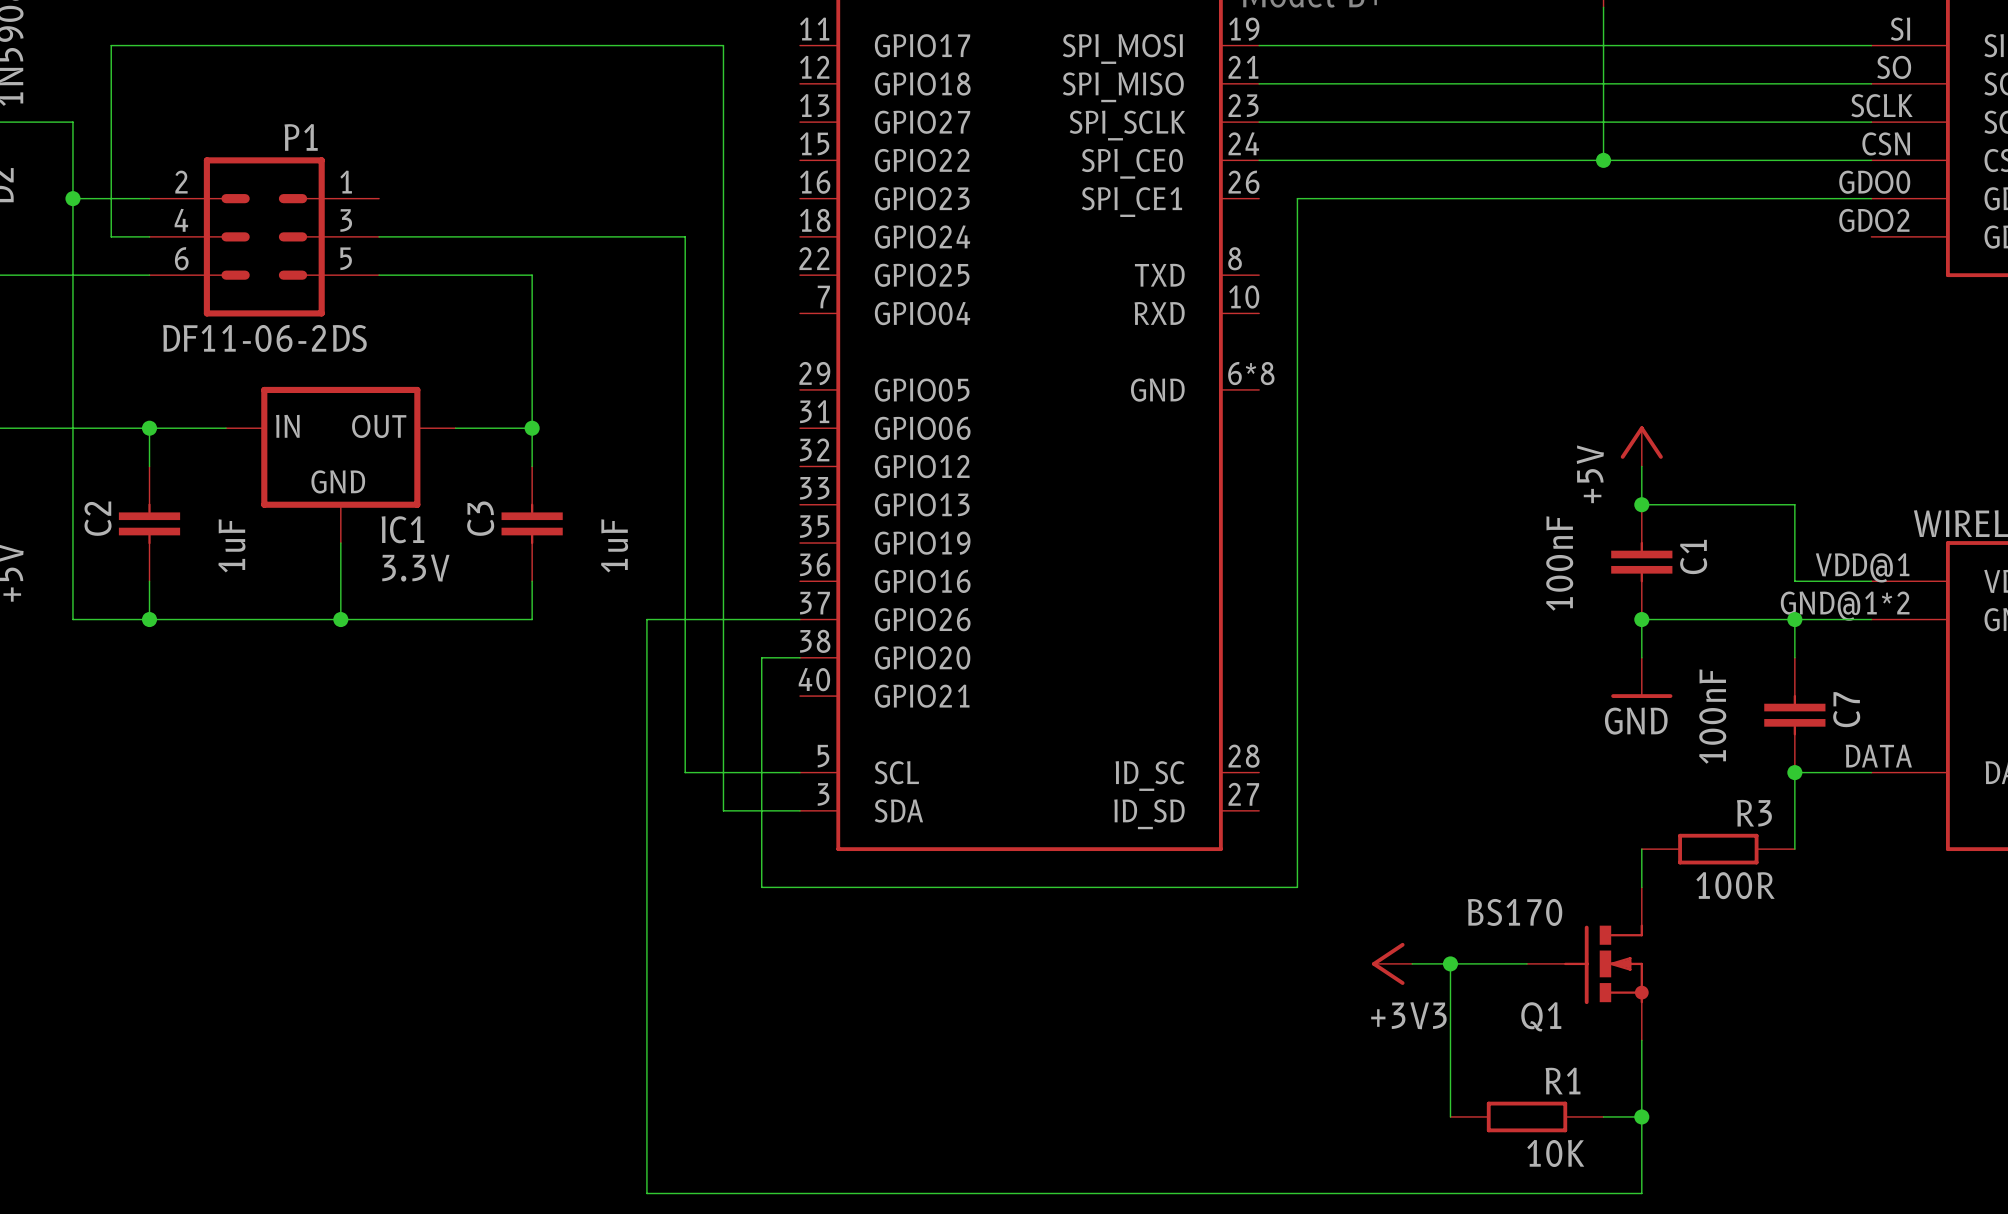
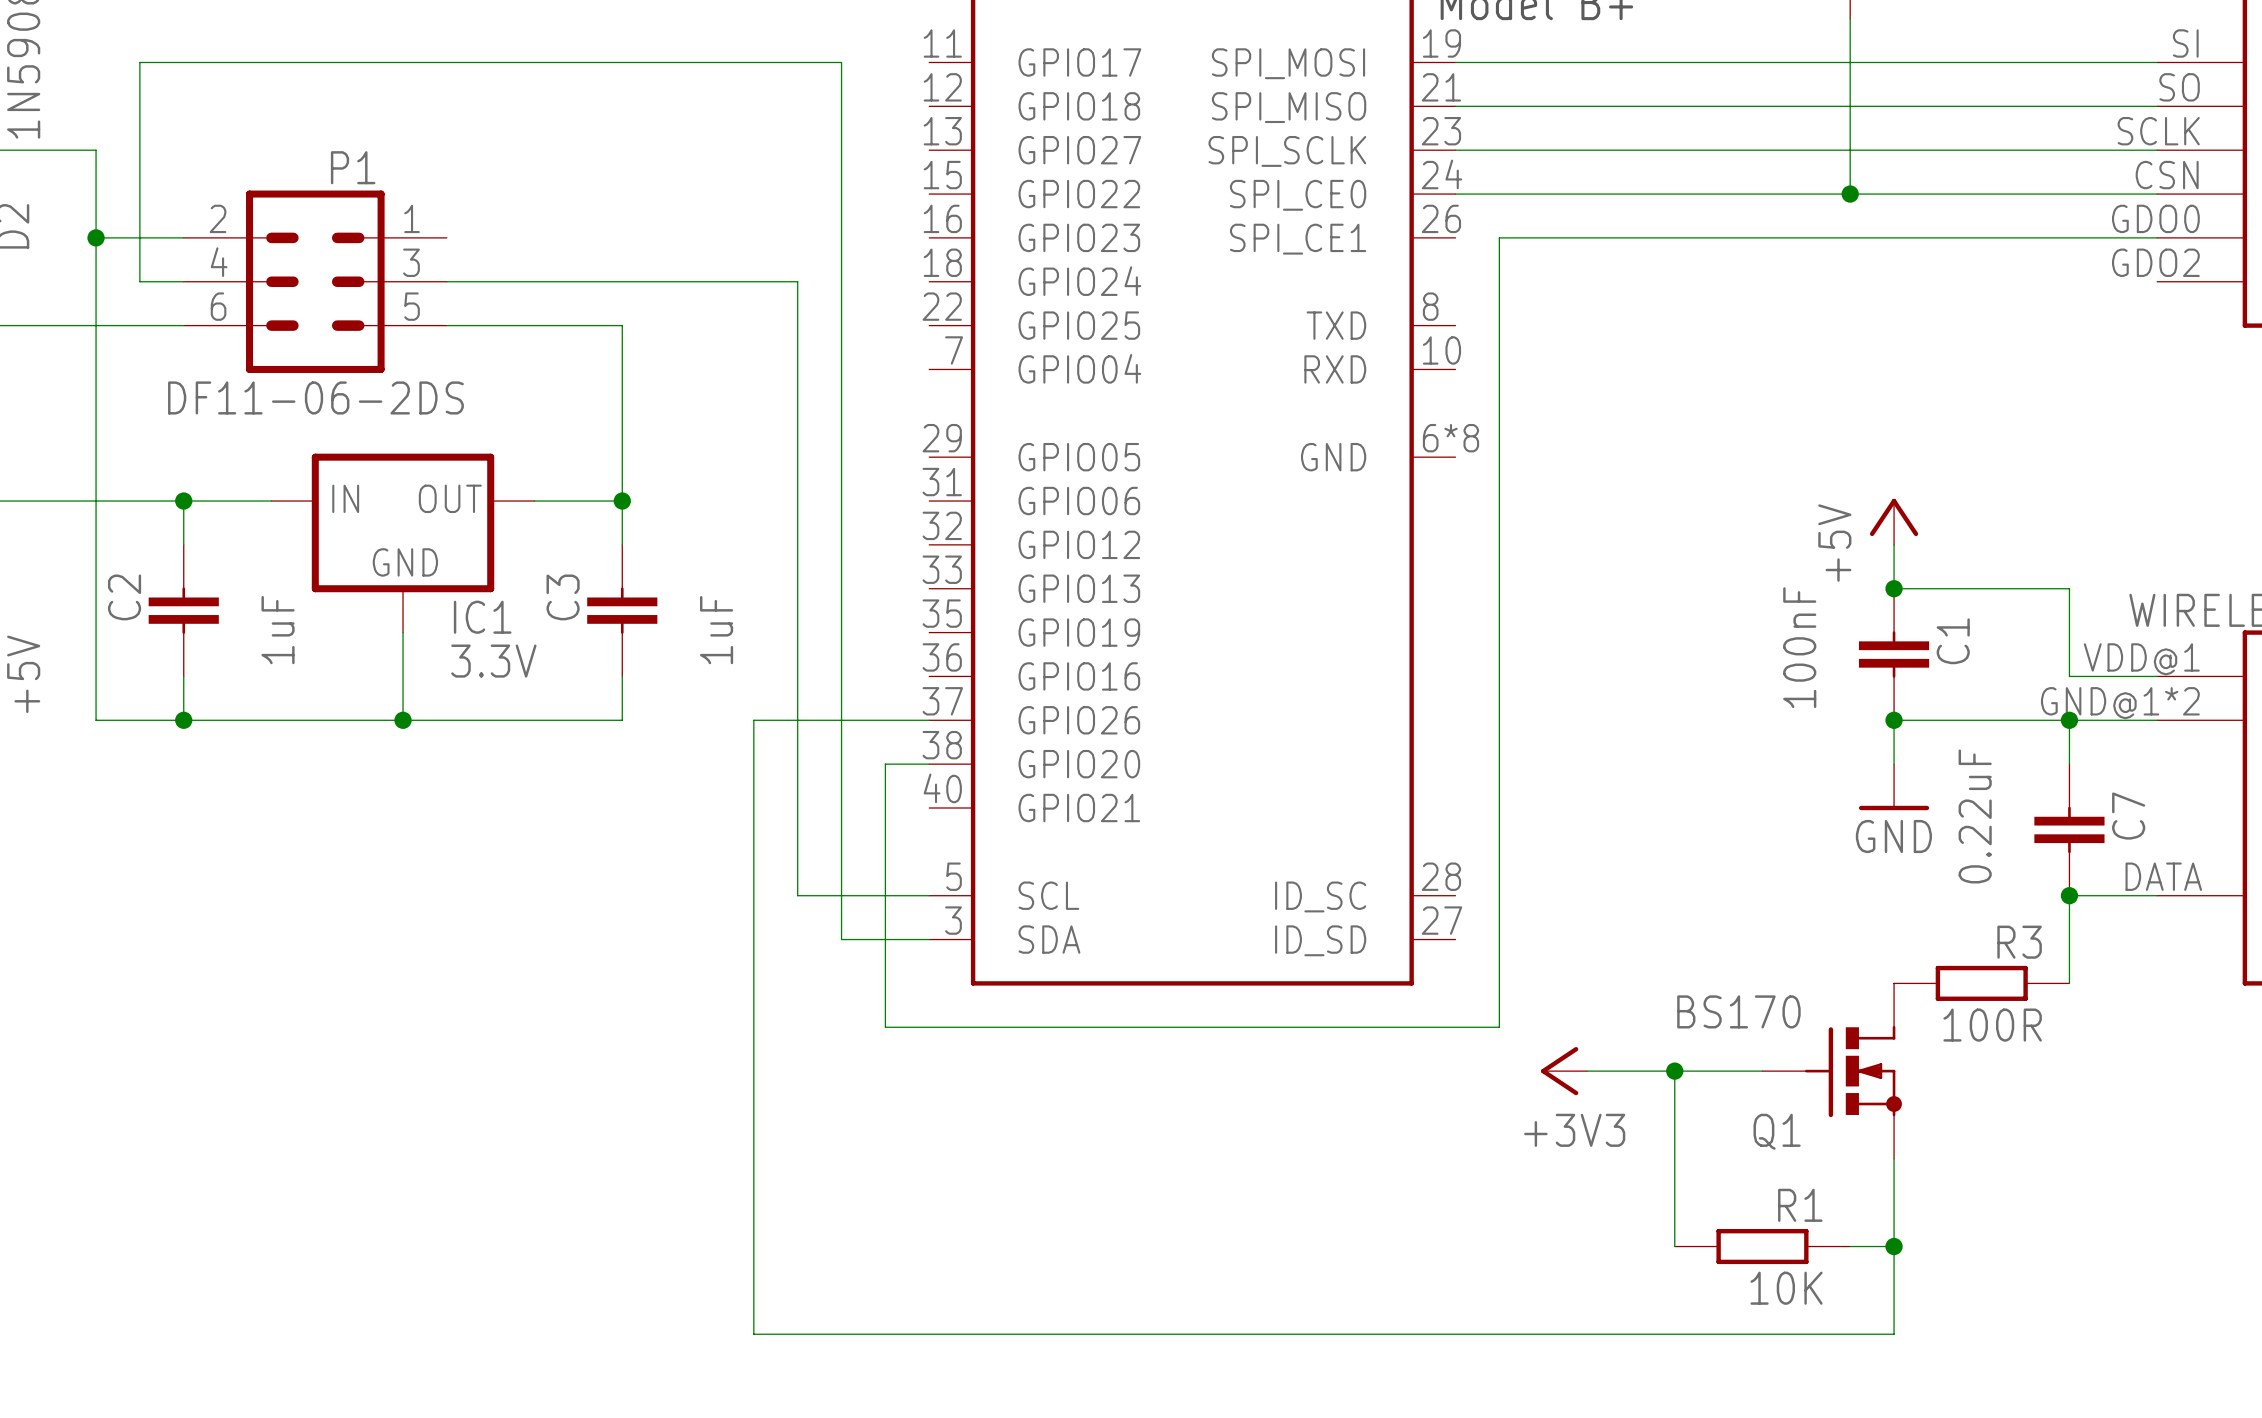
C7 value: 100nF (1712, 716) -> 0.22uF (1975, 816)
wire: none -> (1587, 1071) (1762, 1071)
power symbol position: +3V3 (1392, 963) -> +3V3 (1564, 1071)
wire: (1412, 963) (1527, 963) -> none
junction position: (1450, 963) -> (1674, 1071)
Q1 position: (1587, 963) -> (1832, 1071)
wire: (1450, 1078) (1450, 1116) -> (1674, 1071) (1674, 1114)
R1 position: (1527, 1116) -> (1762, 1246)
wire: (1603, 1116) (1641, 1116) -> (1850, 1246) (1894, 1246)
junction position: (1641, 1116) -> (1894, 1246)
wire: (646, 1155) (646, 1193) (1641, 1193) (1641, 1155) -> (753, 1334) (1894, 1334)

